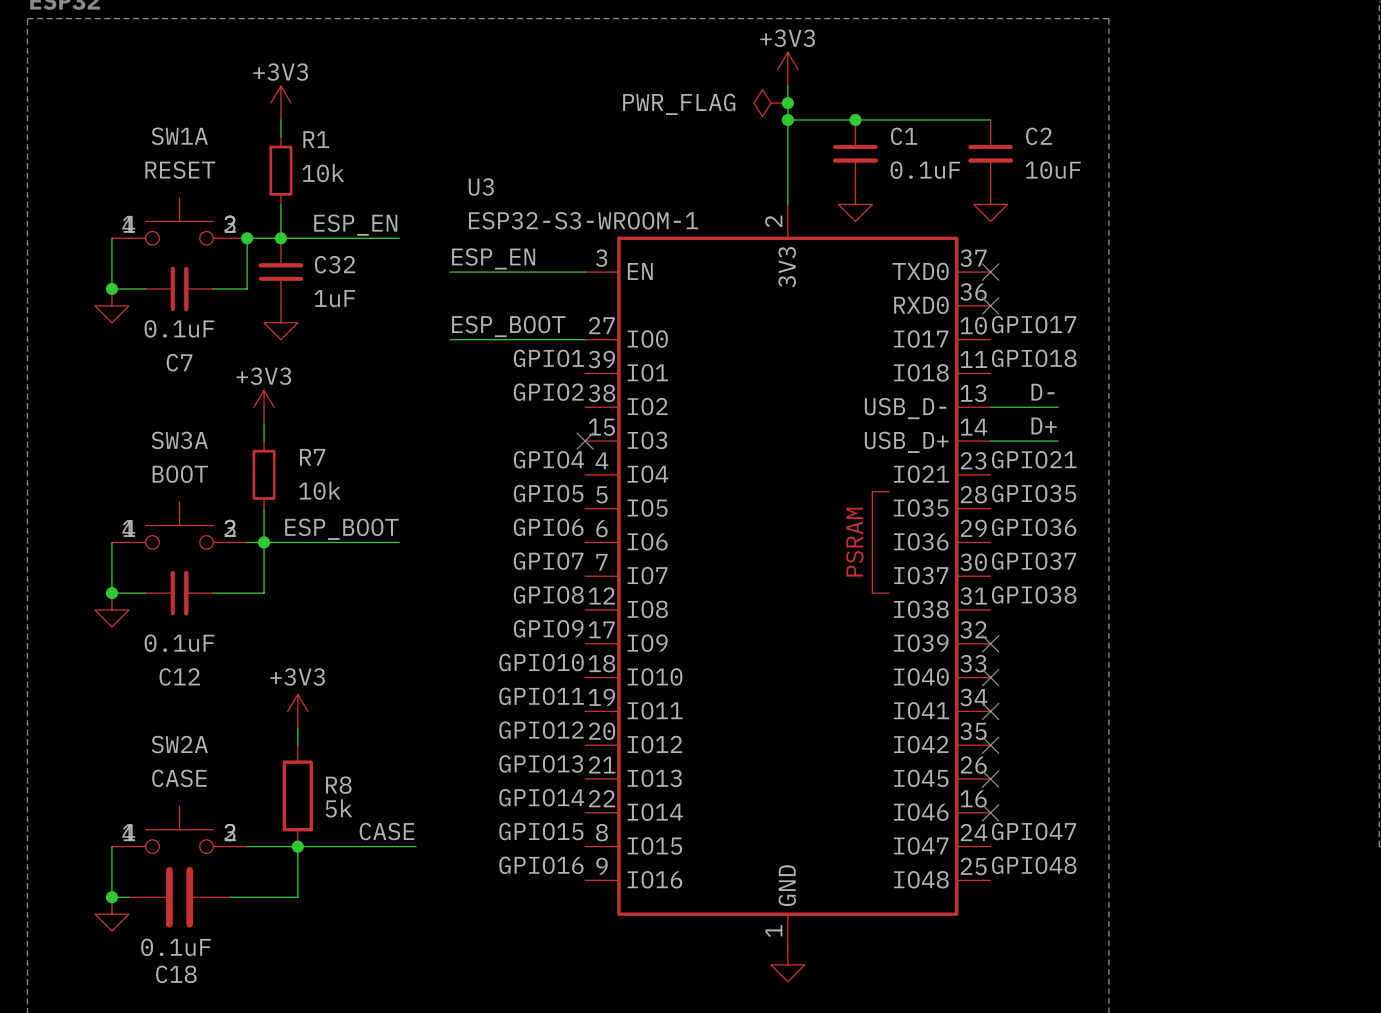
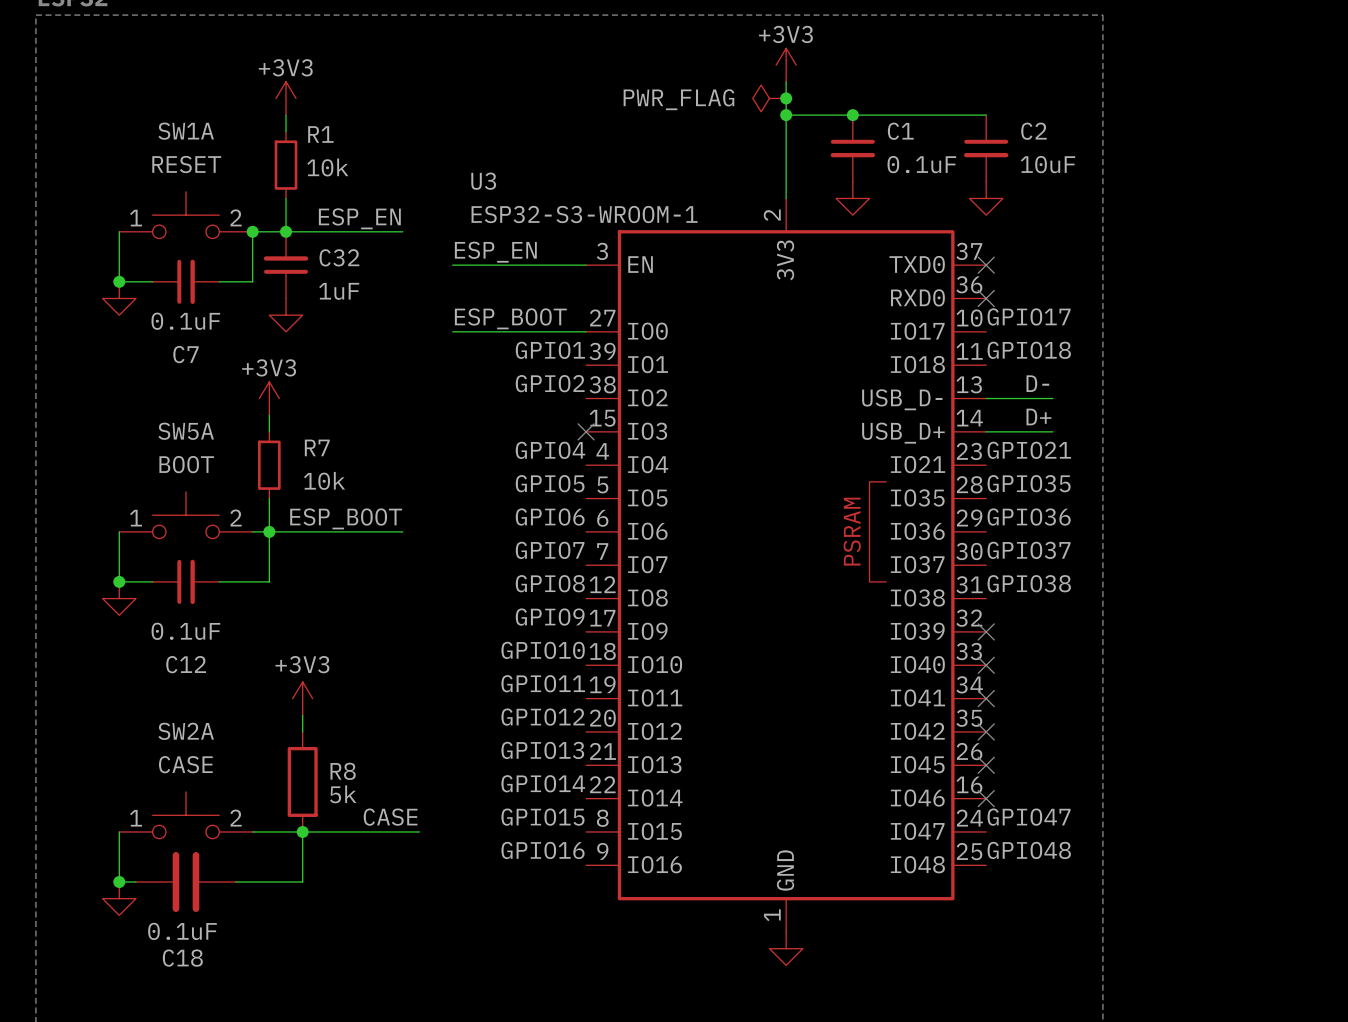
SW1A symbol: [111, 197, 248, 246] -> [119, 191, 253, 239]
SW3A name: SW3A (179, 440) -> SW5A (186, 431)
SW3A symbol: [111, 501, 248, 550] -> [119, 491, 253, 539]
SW2A symbol: [111, 806, 248, 854] -> [119, 791, 253, 839]

